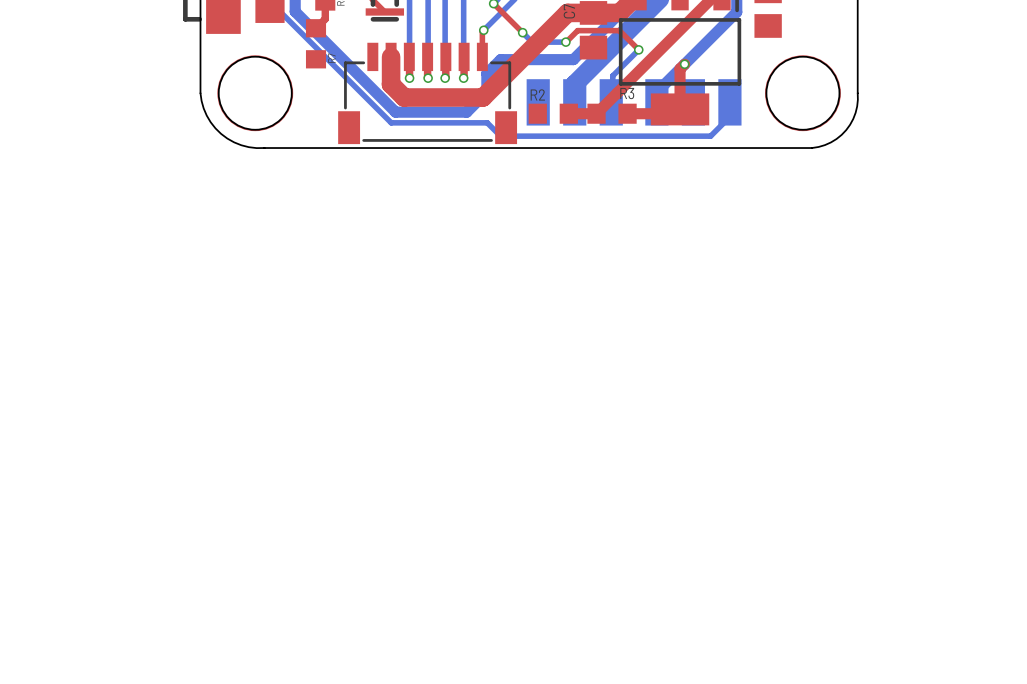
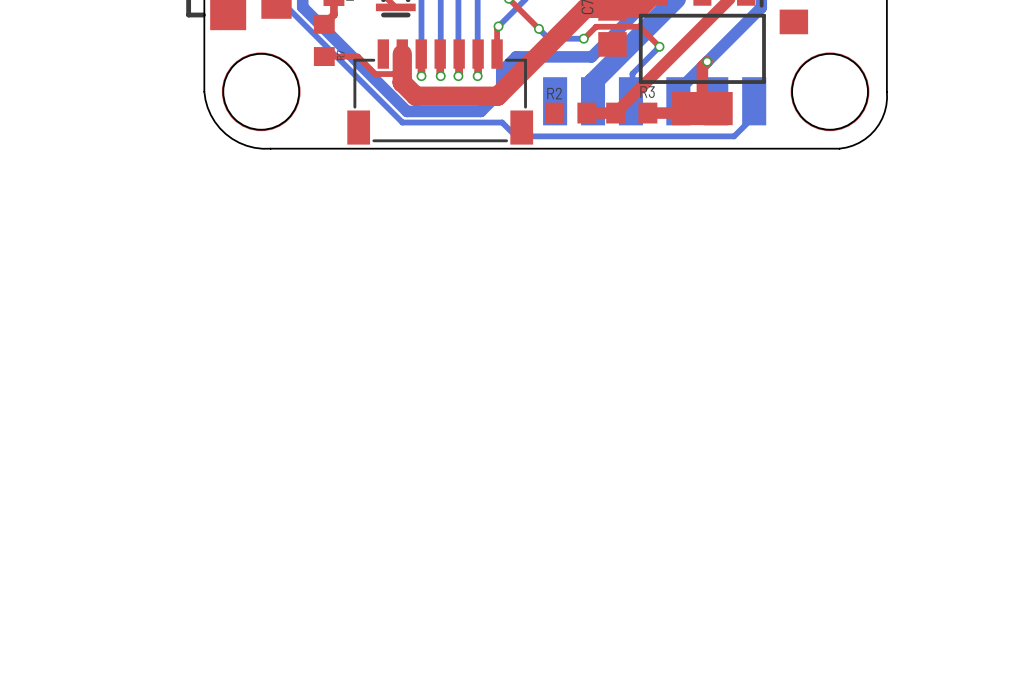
top track: none -> (324, 56) (357, 56) (375, 74) (393, 74) (402, 82)

